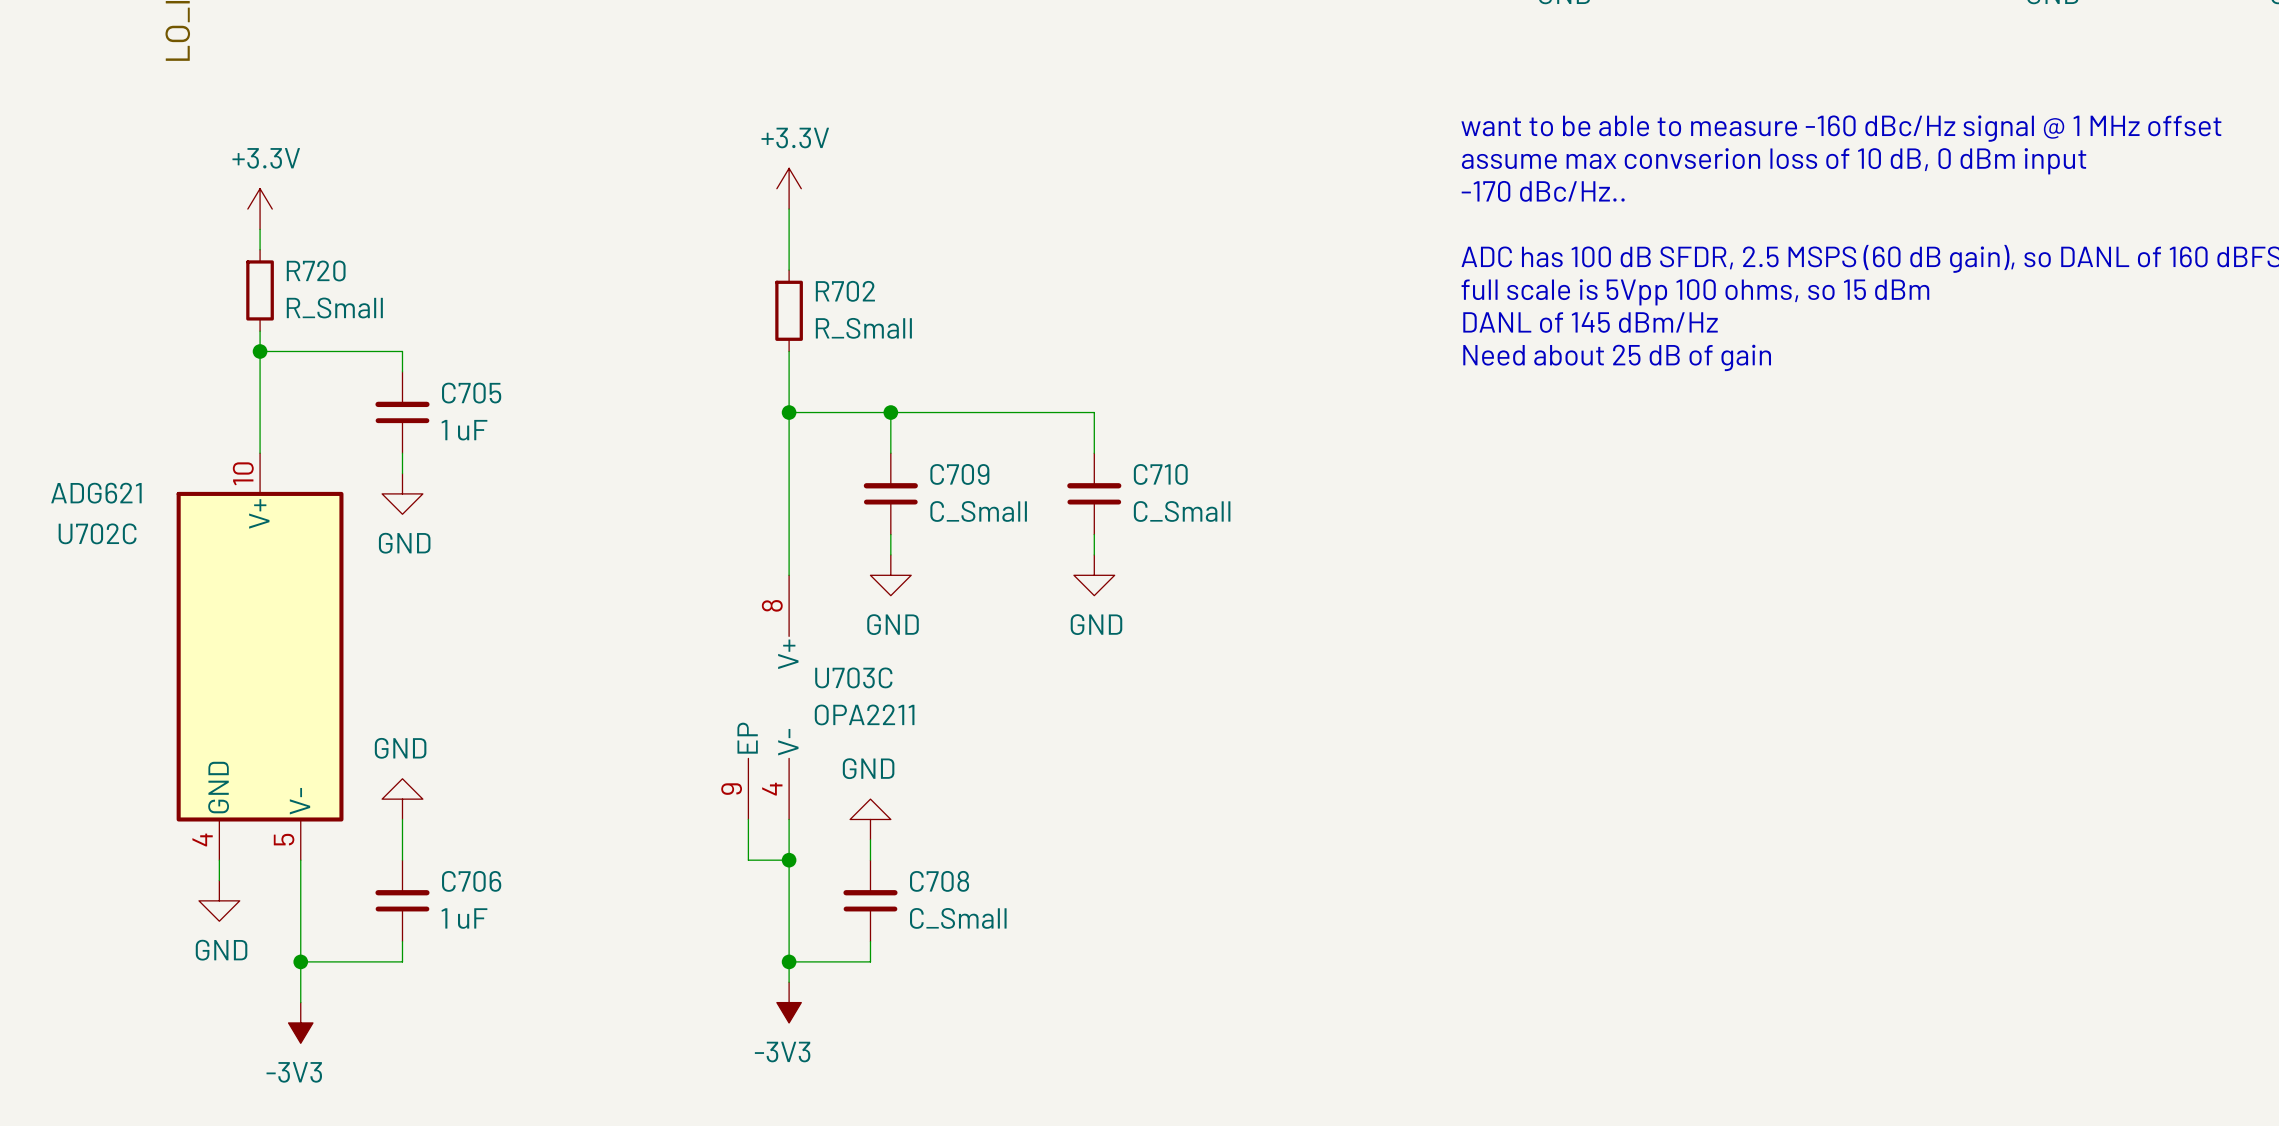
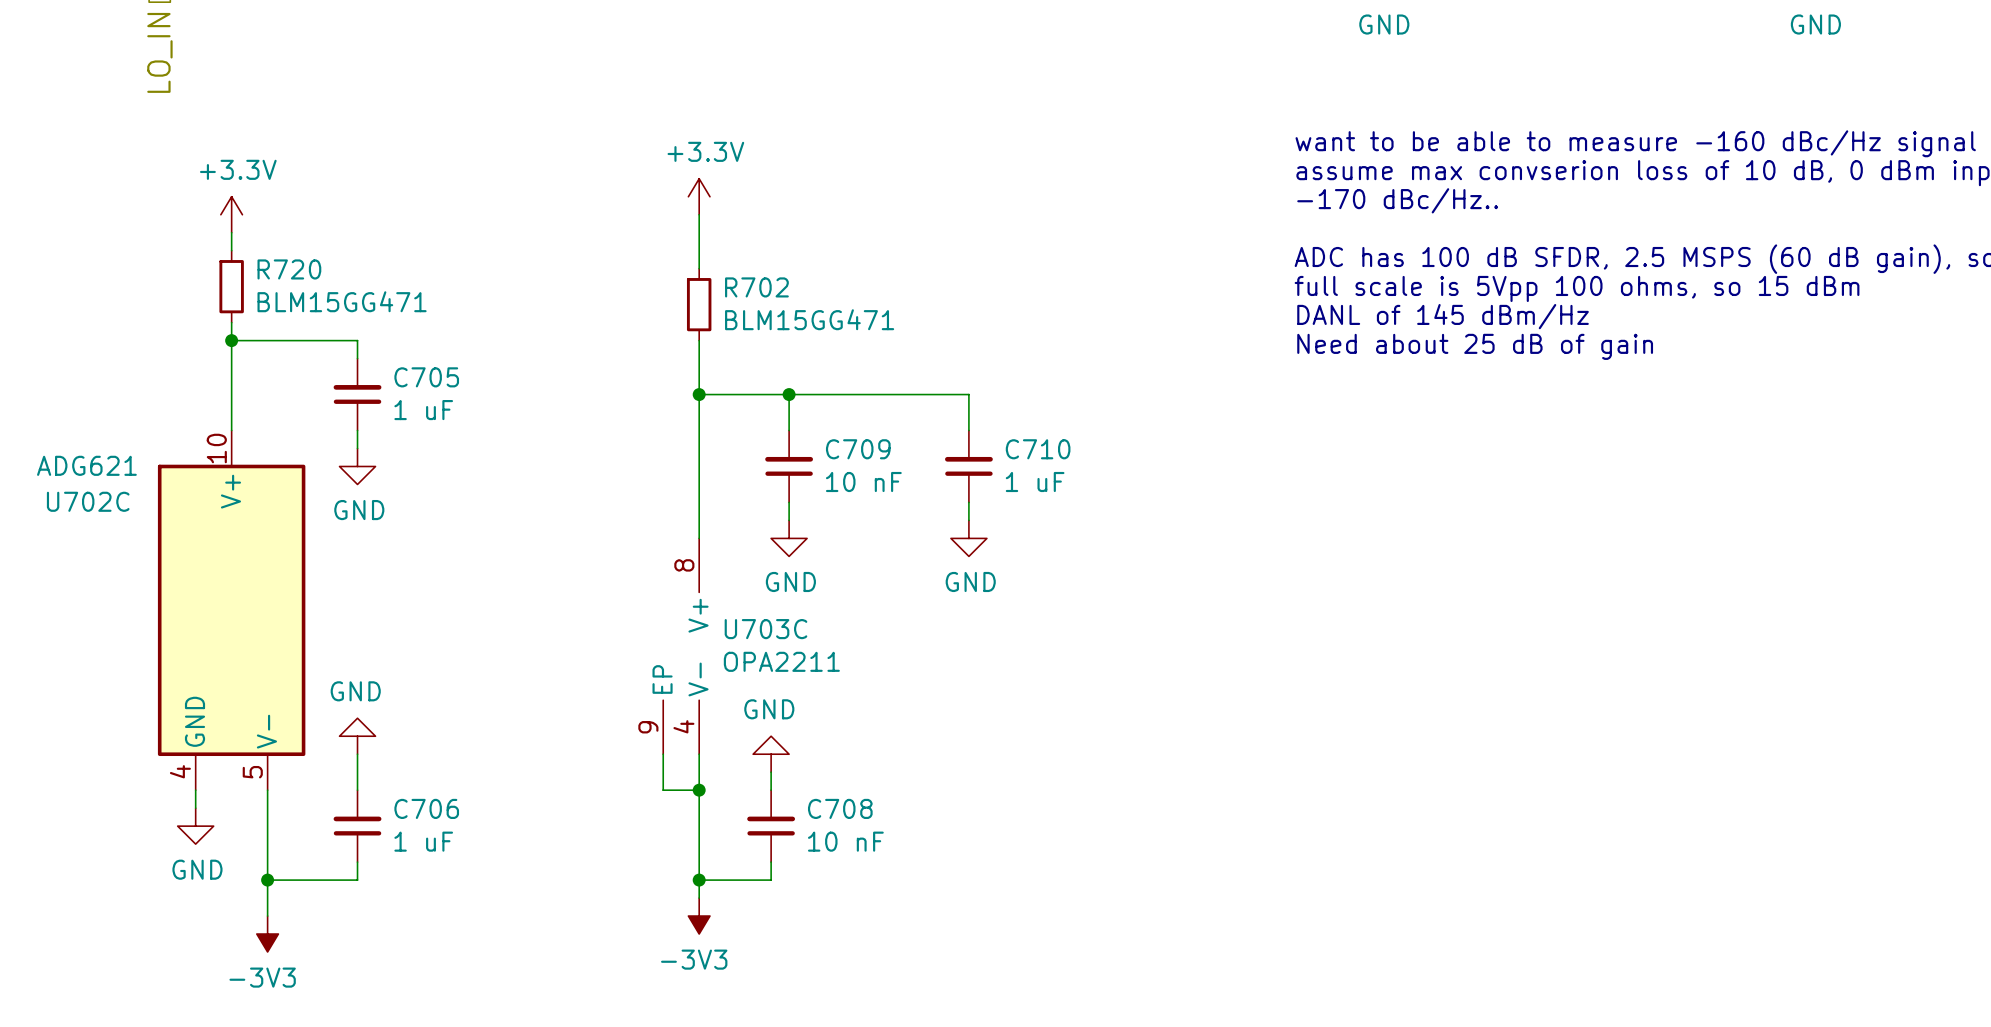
R720 value: R_Small (334, 307) -> BLM15GG471 (342, 301)
R702 value: R_Small (863, 328) -> BLM15GG471 (809, 319)
C709 value: C_Small (978, 511) -> 10 nF (863, 482)
C710 value: C_Small (1182, 511) -> 1 uF (1035, 482)
C708 value: C_Small (958, 918) -> 10 nF (845, 841)

